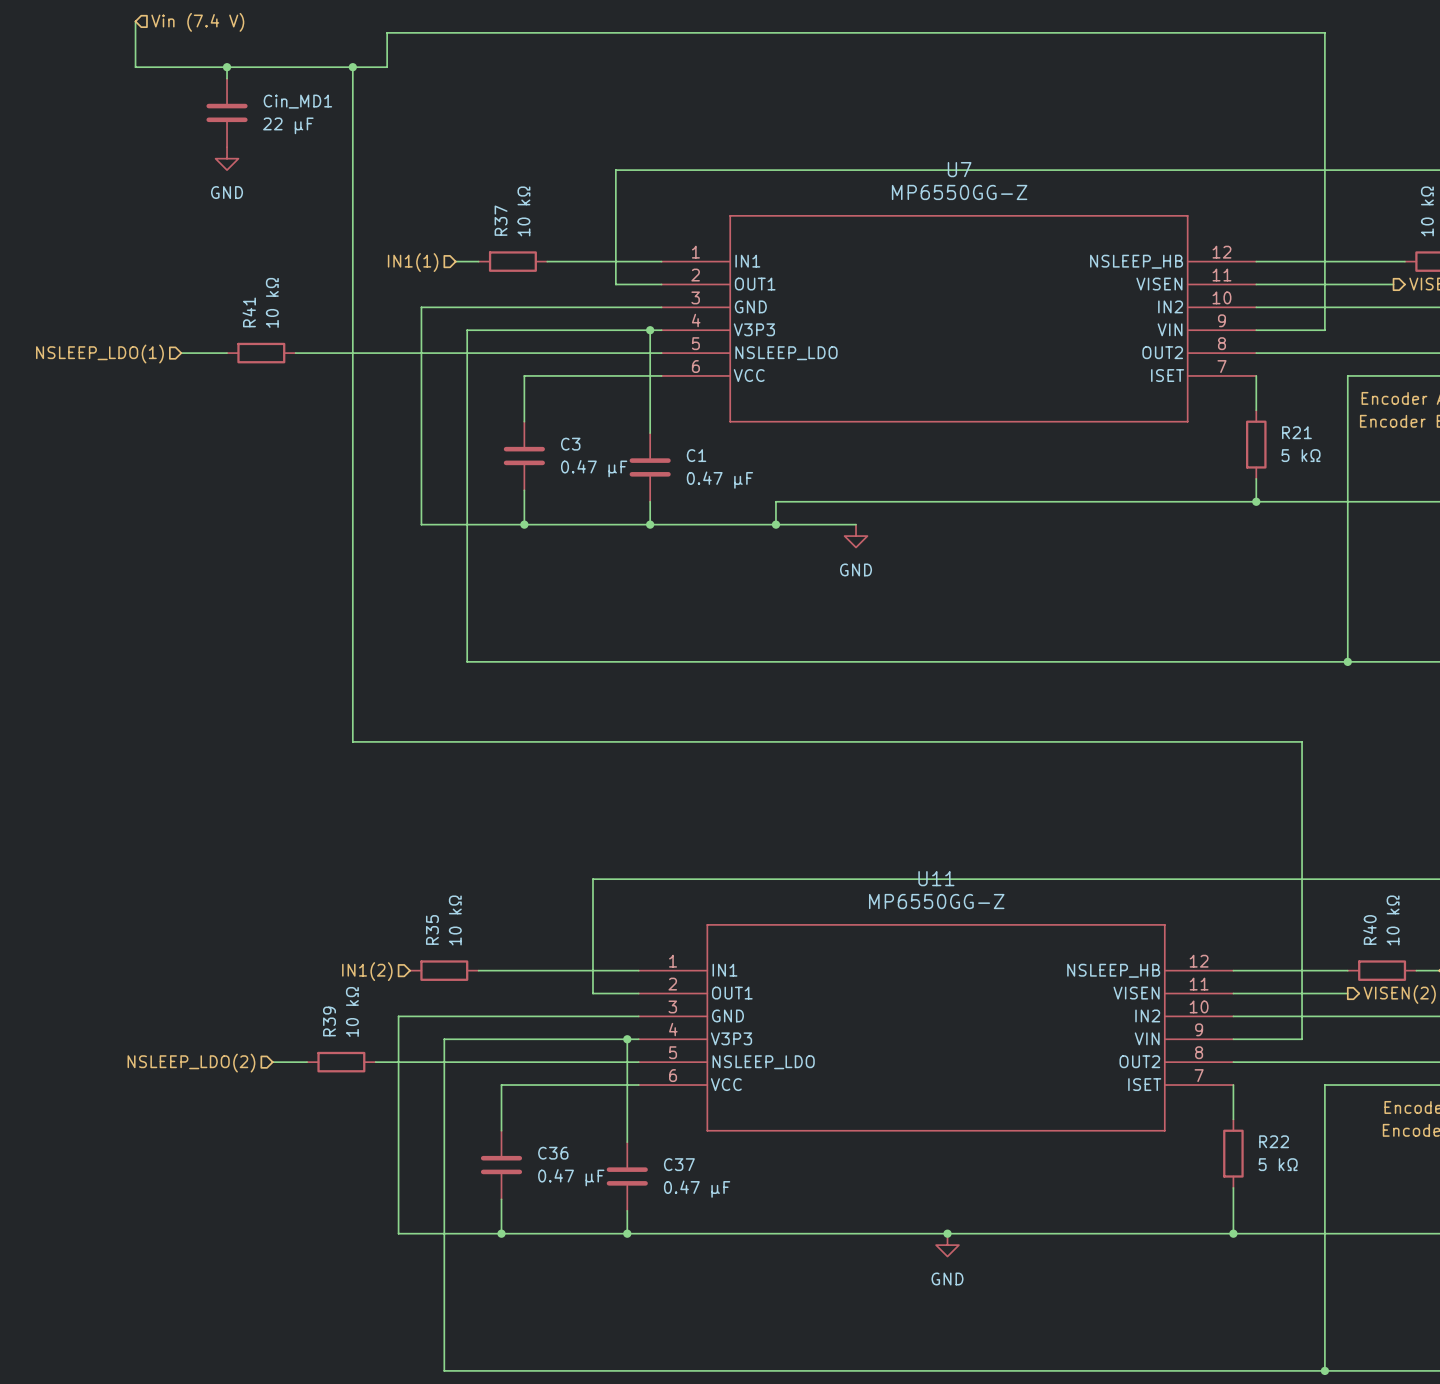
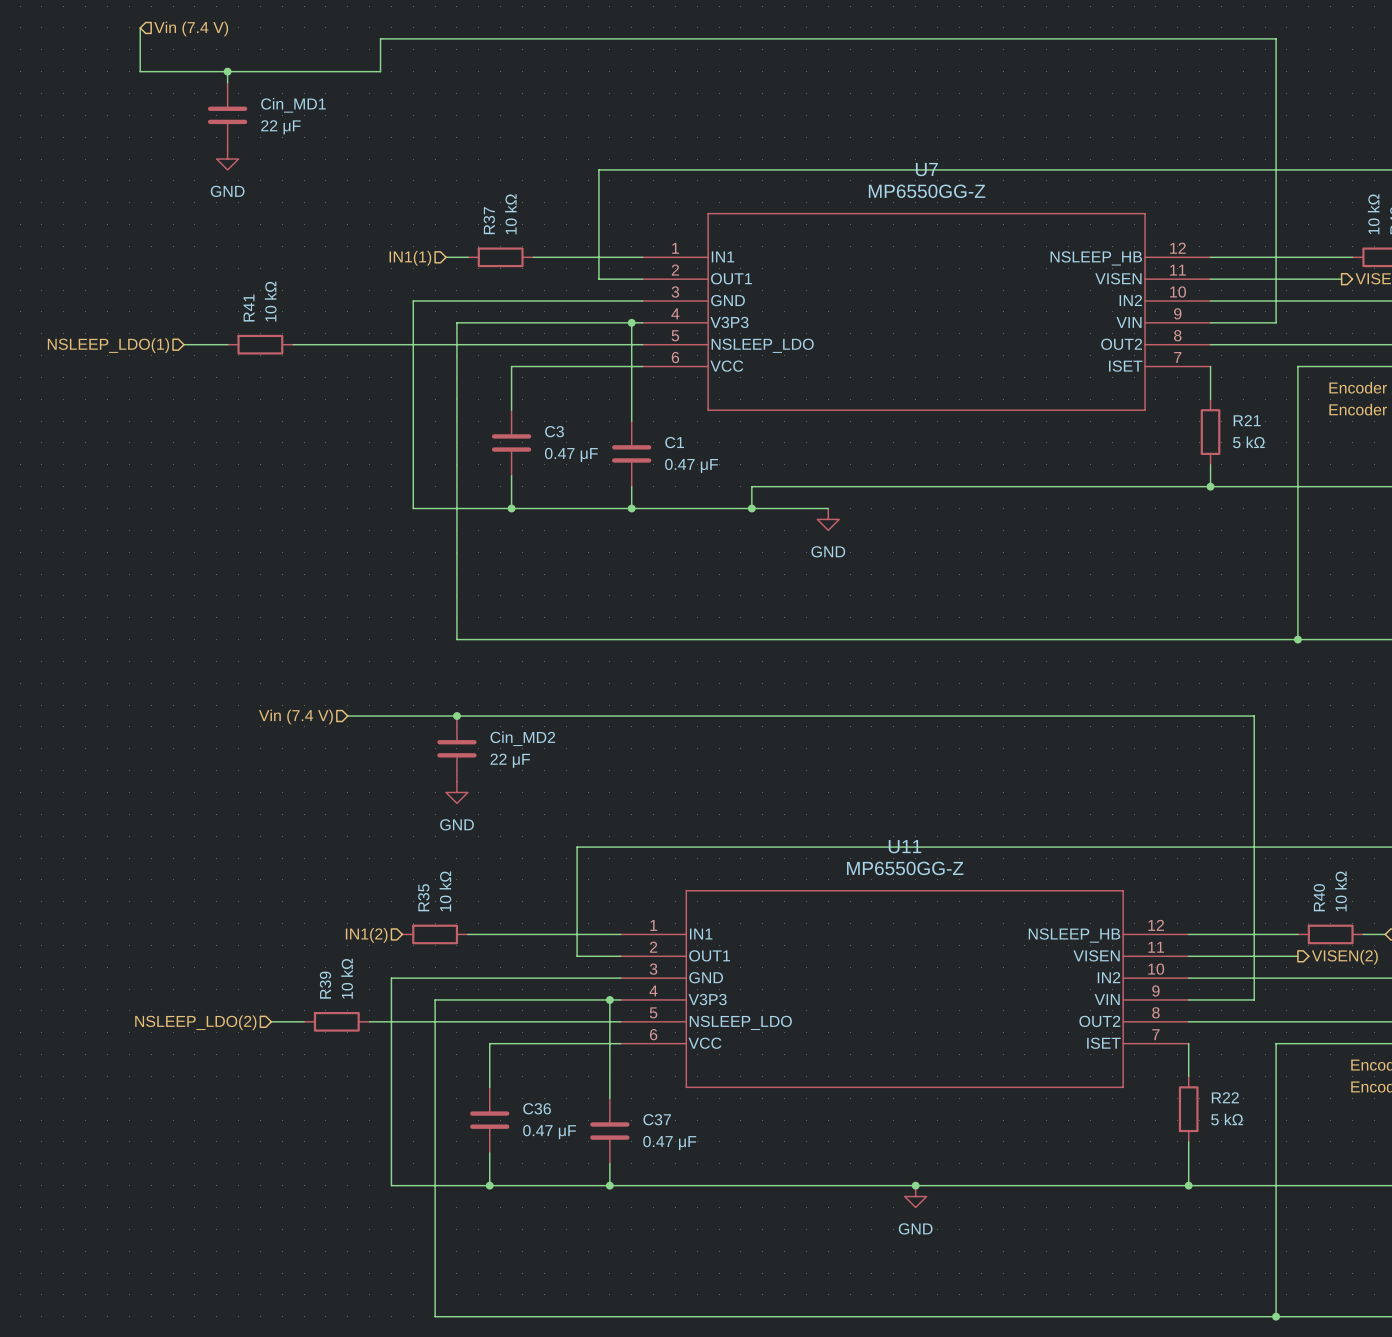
wire: (352, 67) (352, 741) -> none
junction: (352, 67) -> none
junction: none -> (456, 716)
hierarchical label: none -> Vin (7.4 V) (295, 716)
Cin_MD2: none -> 22 μF (456, 748)
power symbol: none -> GND (456, 792)

